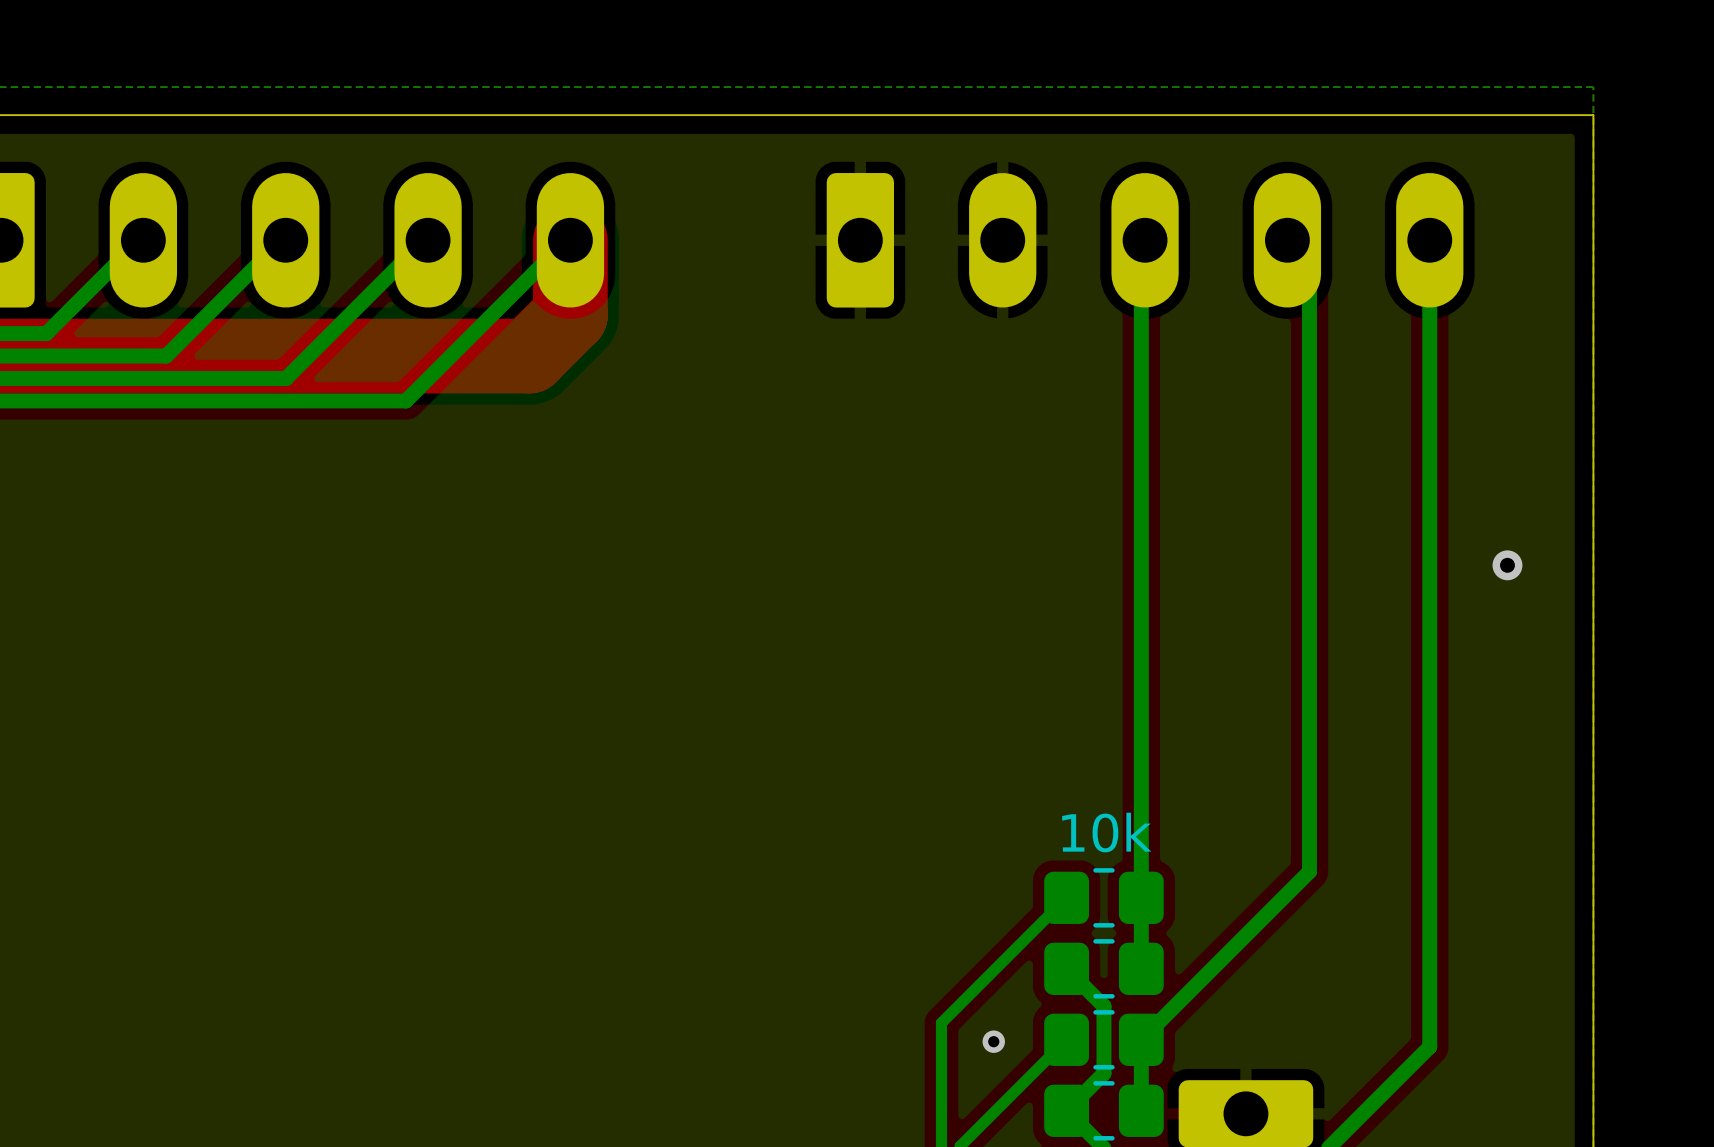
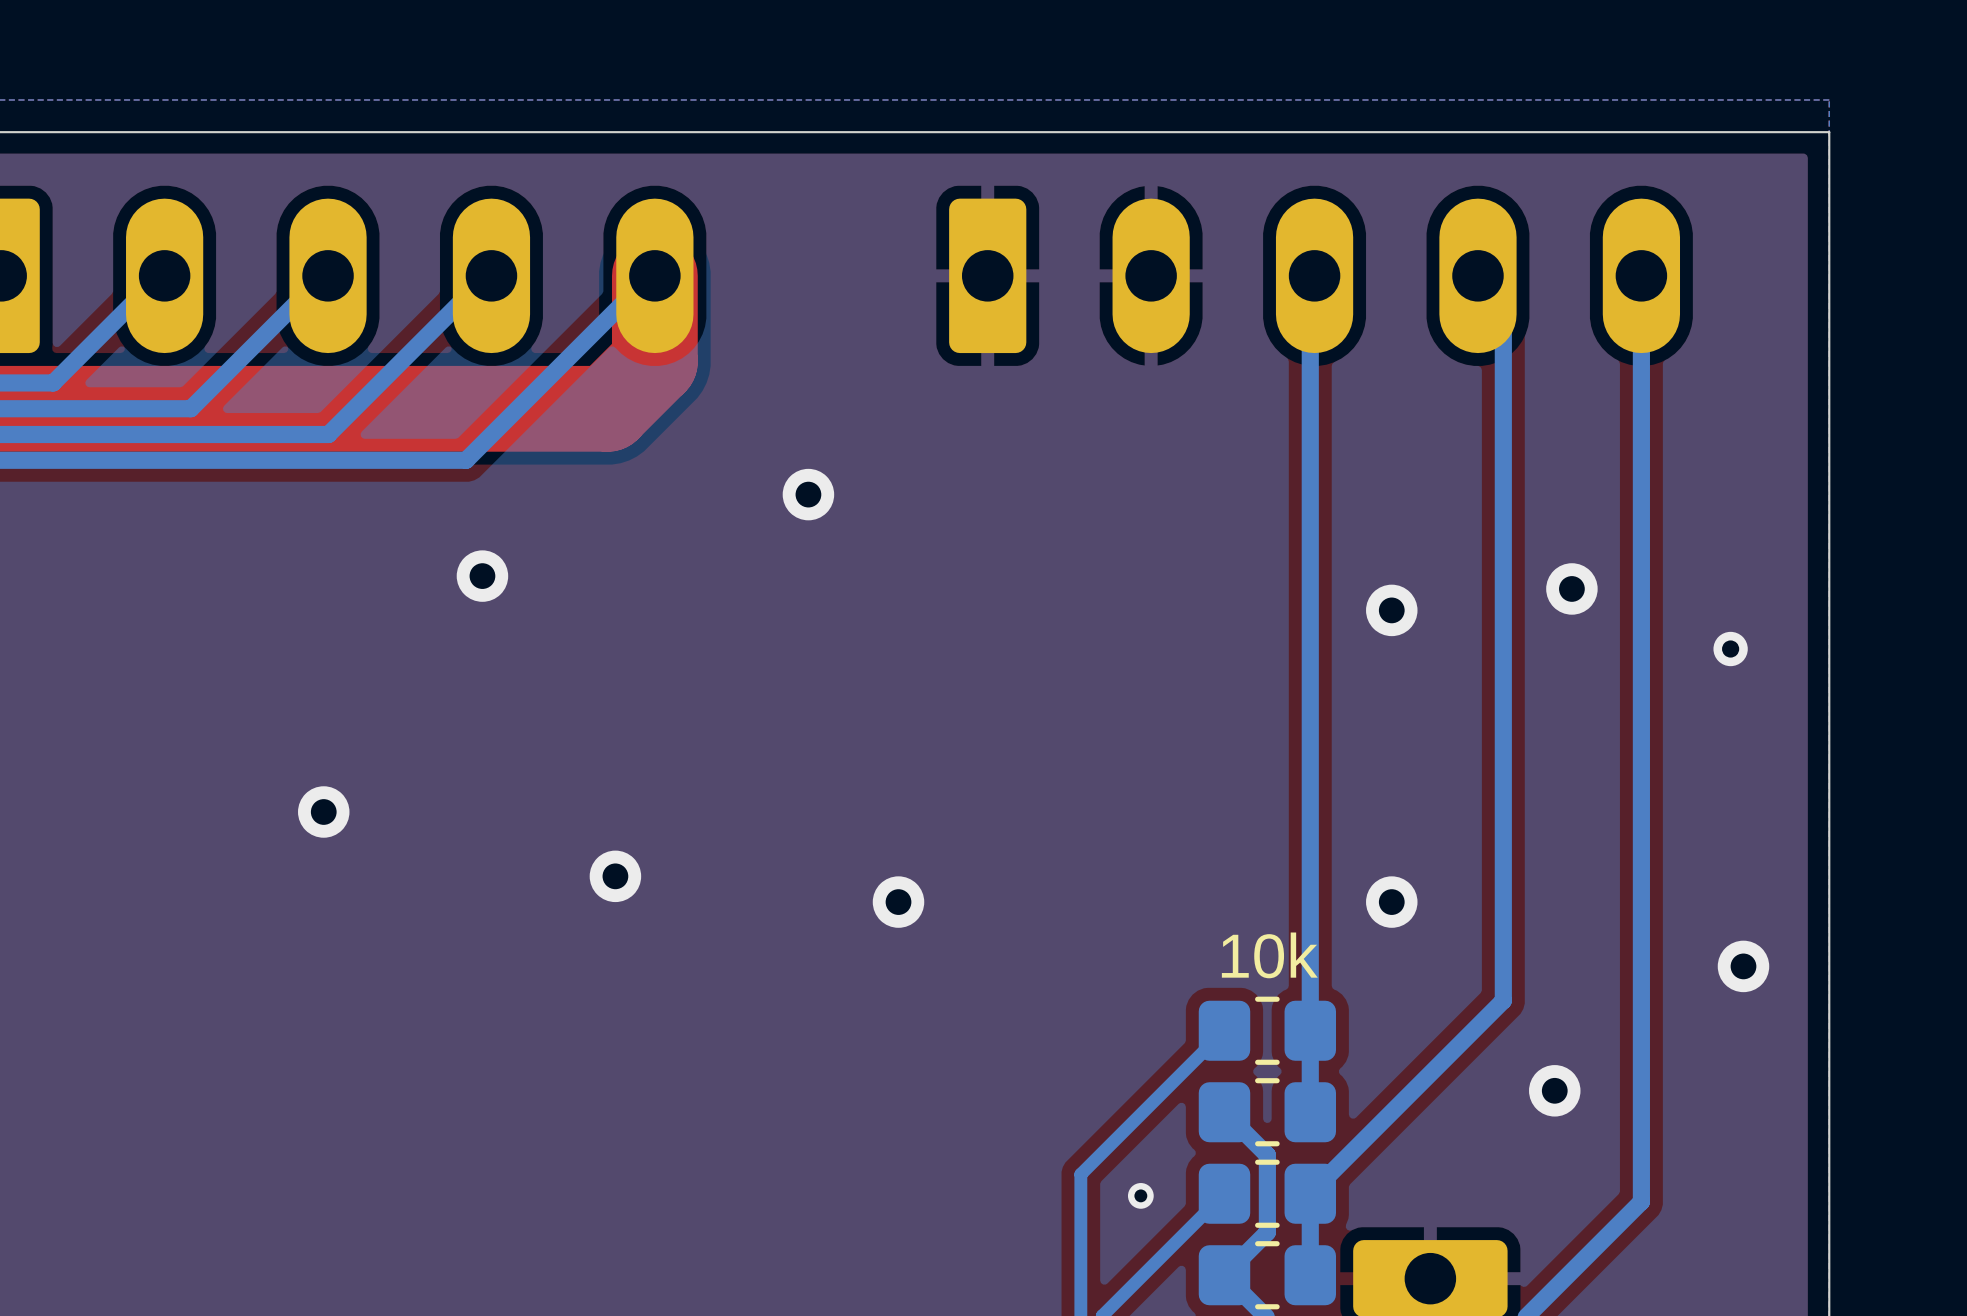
via: none -> (808, 494)
via: none -> (482, 576)
via: none -> (1571, 588)
via: none -> (1391, 610)
via: none -> (323, 812)
via: none -> (615, 876)
via: none -> (898, 902)
via: none -> (1391, 902)
via: none -> (1743, 966)
via: none -> (1554, 1090)

